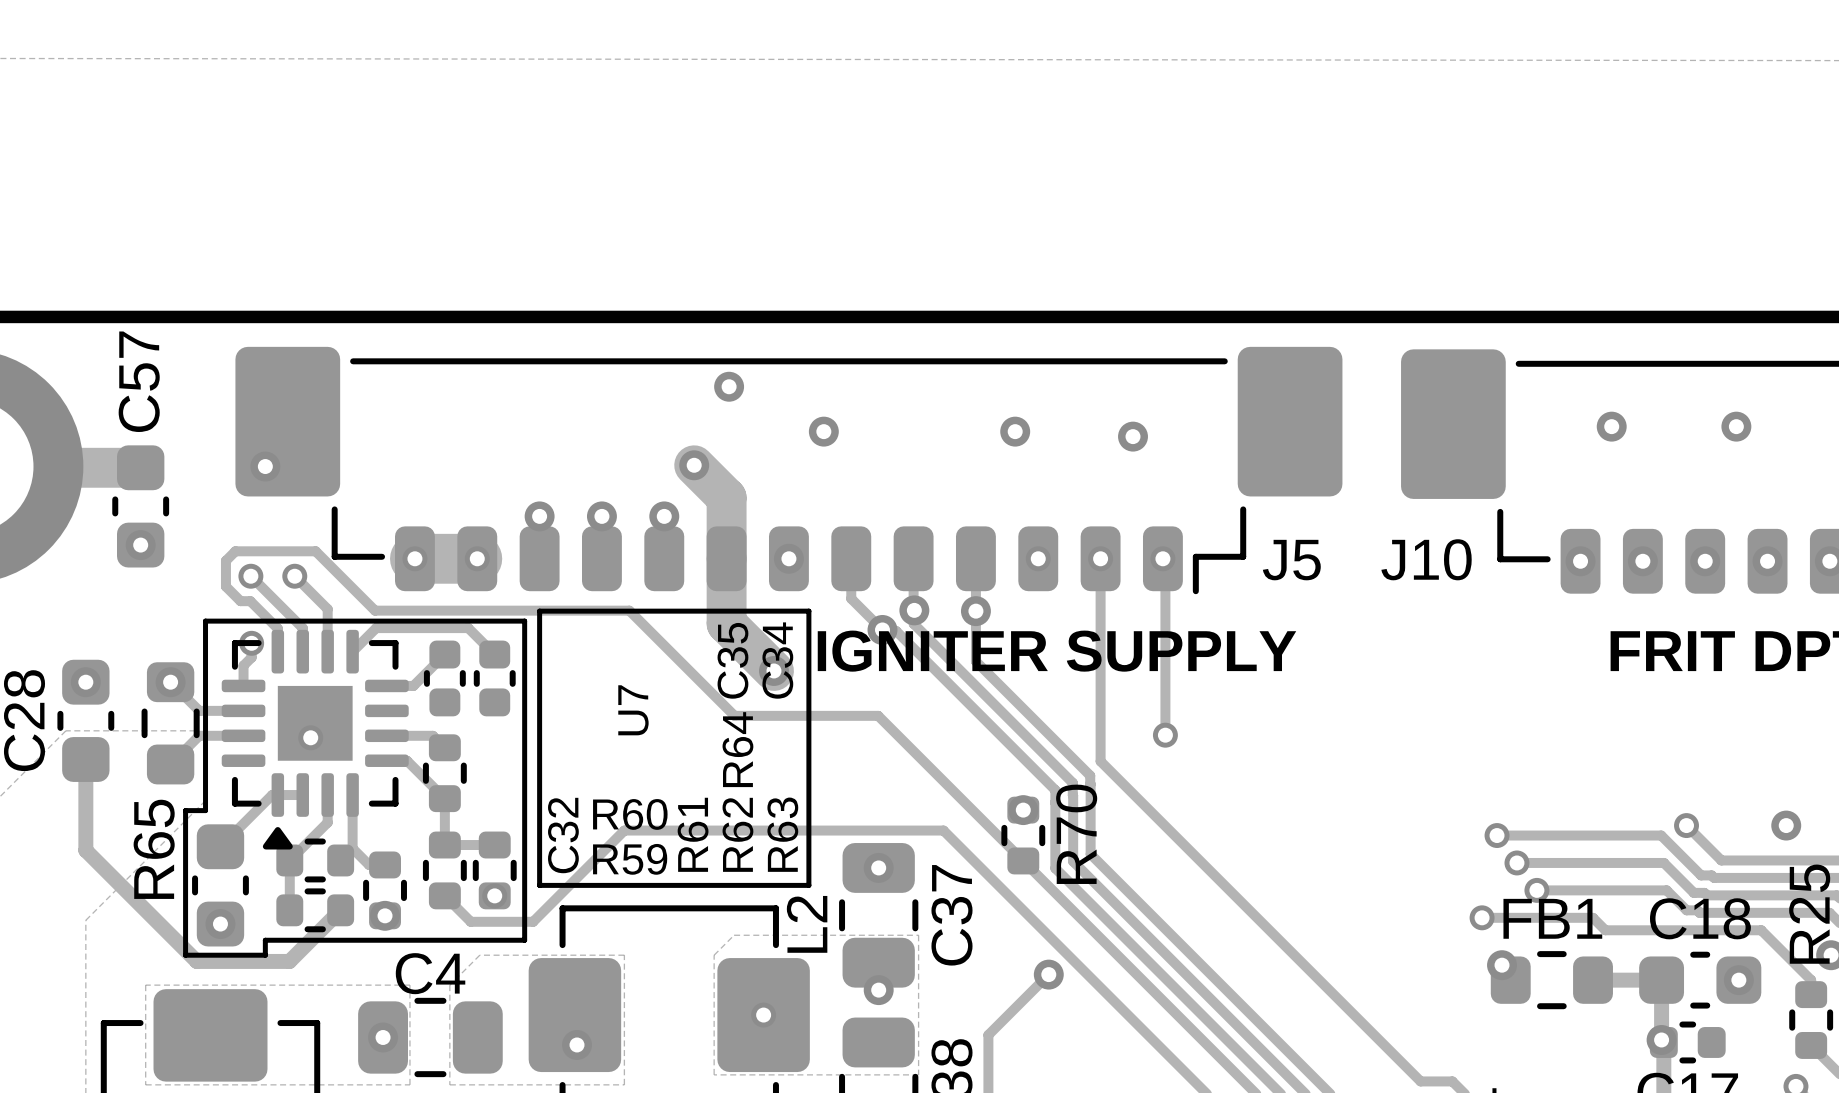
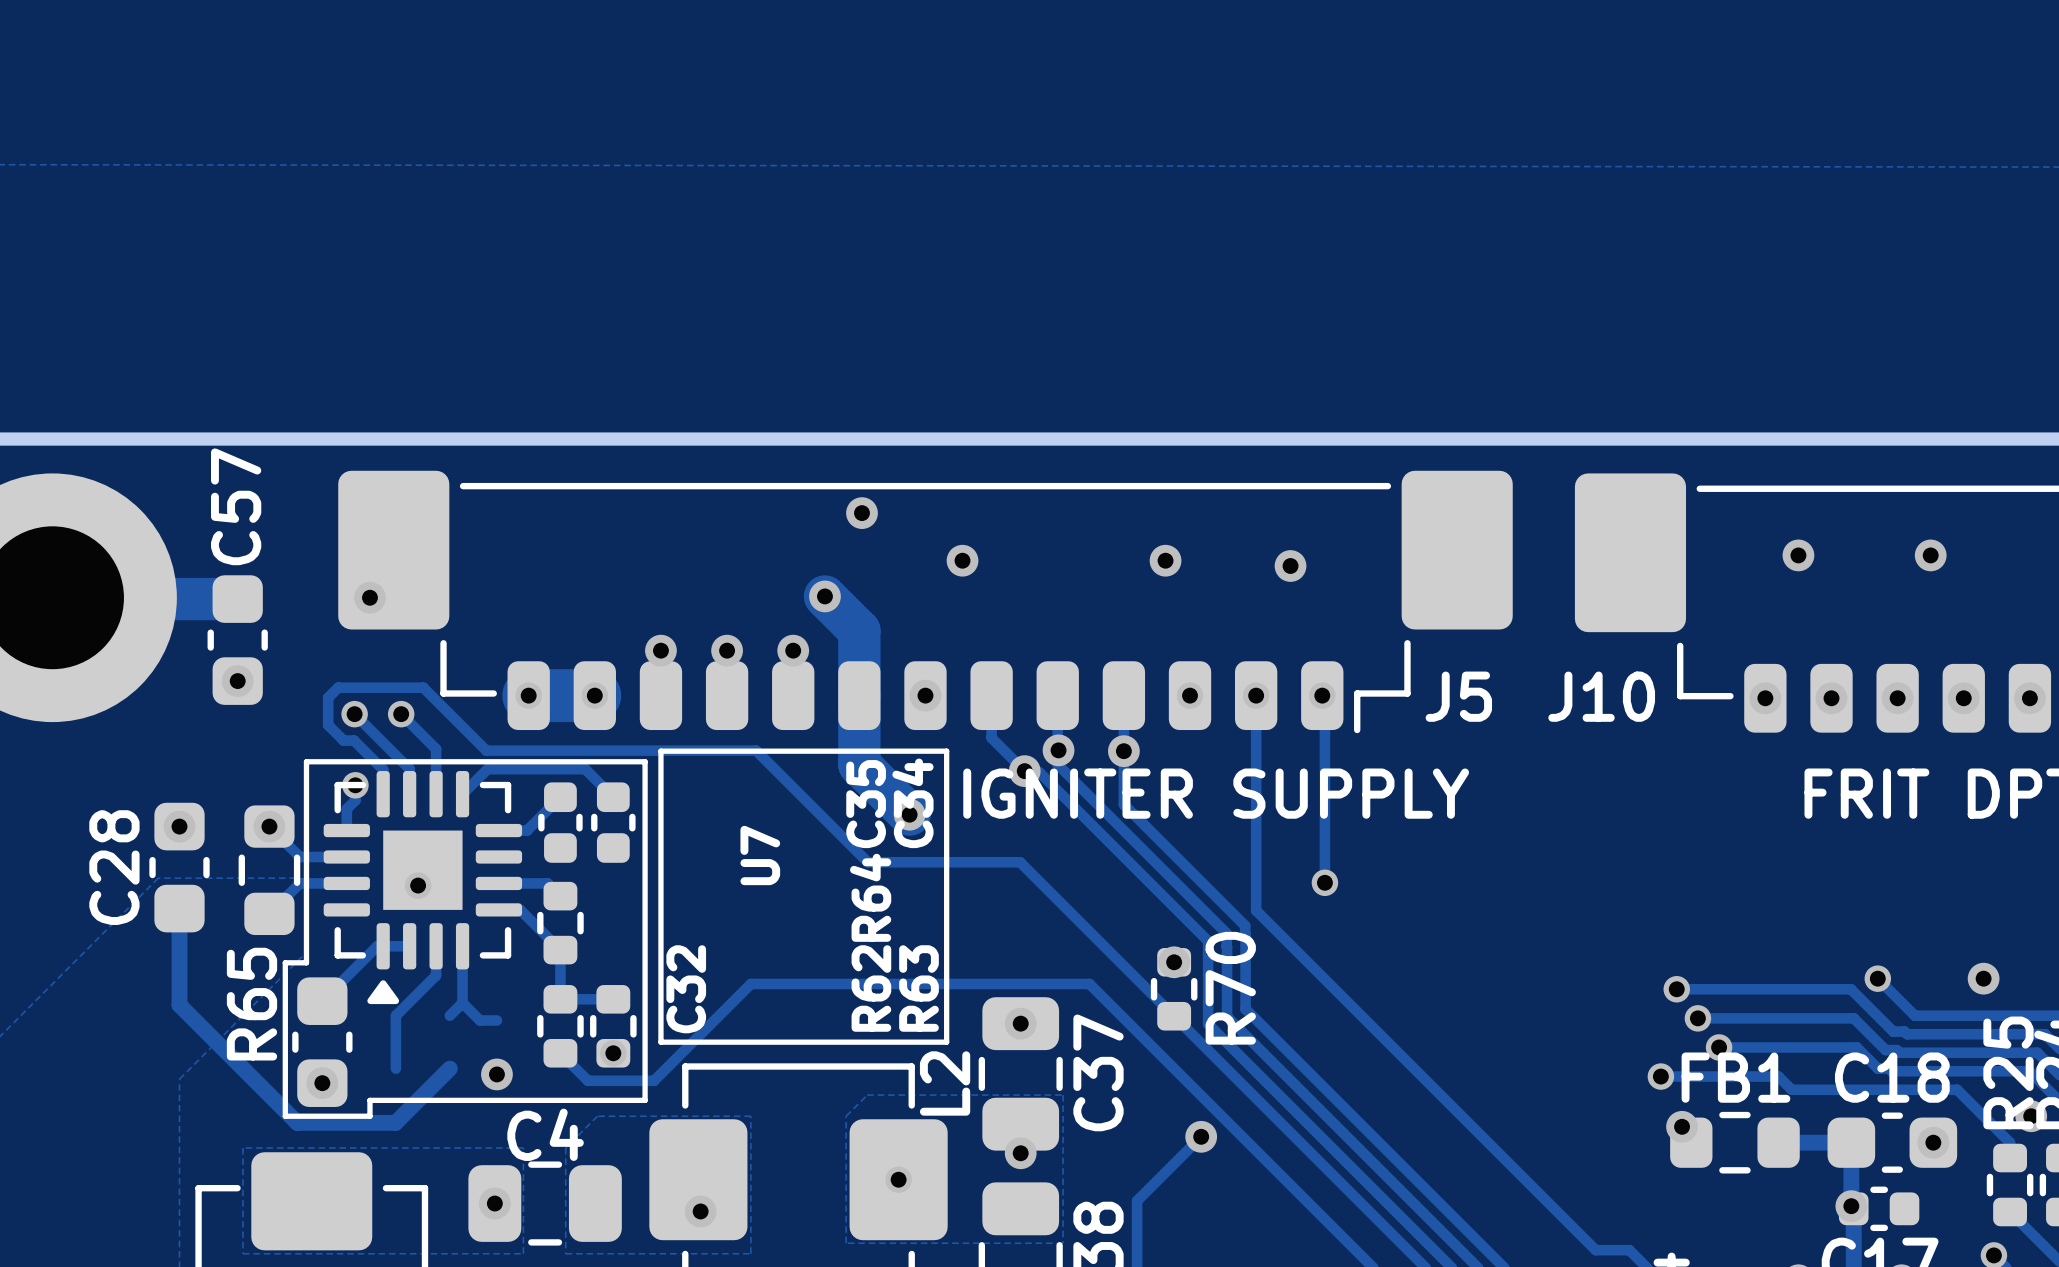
R60: (315, 860) -> none
R61: (385, 890) -> none
R59: (315, 910) -> none

